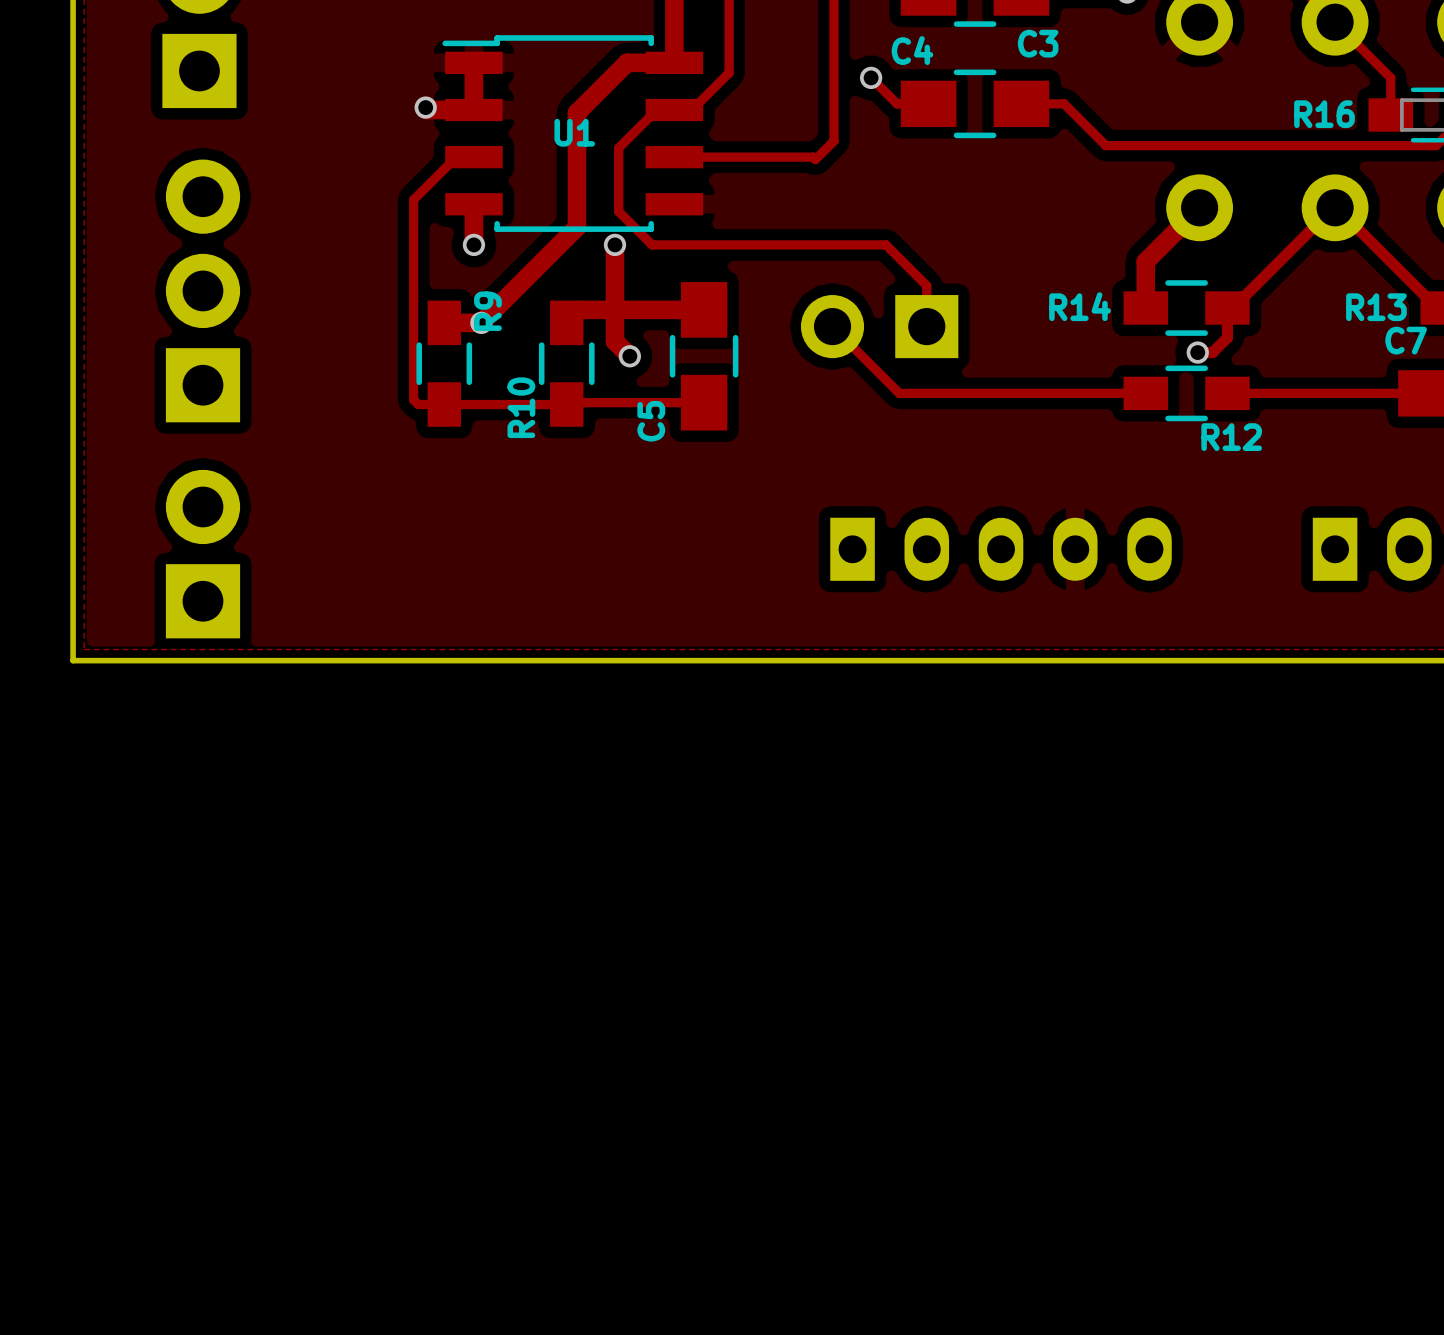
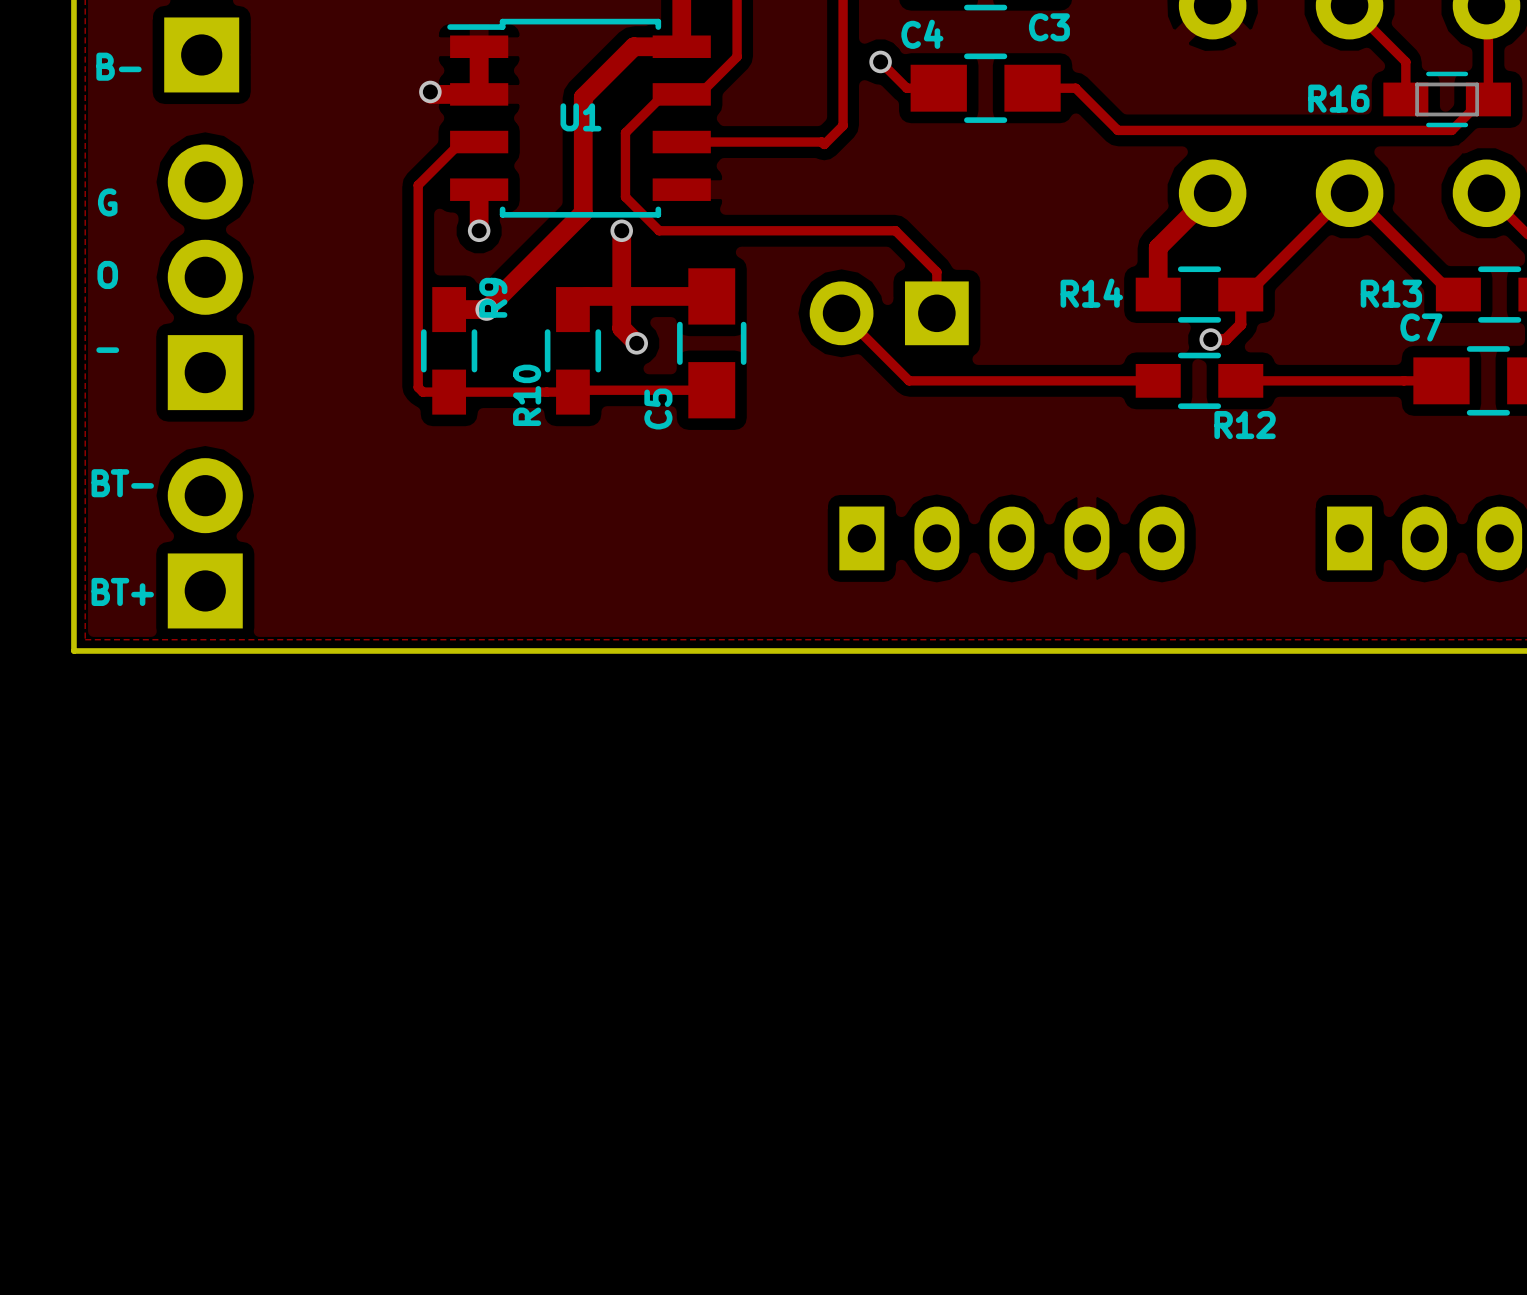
text: none -> B- (118, 66)
text: none -> G (107, 202)
text: none -> O (107, 274)
text: none -> - (107, 350)
text: none -> BT- (122, 483)
text: none -> BT+ (122, 591)

